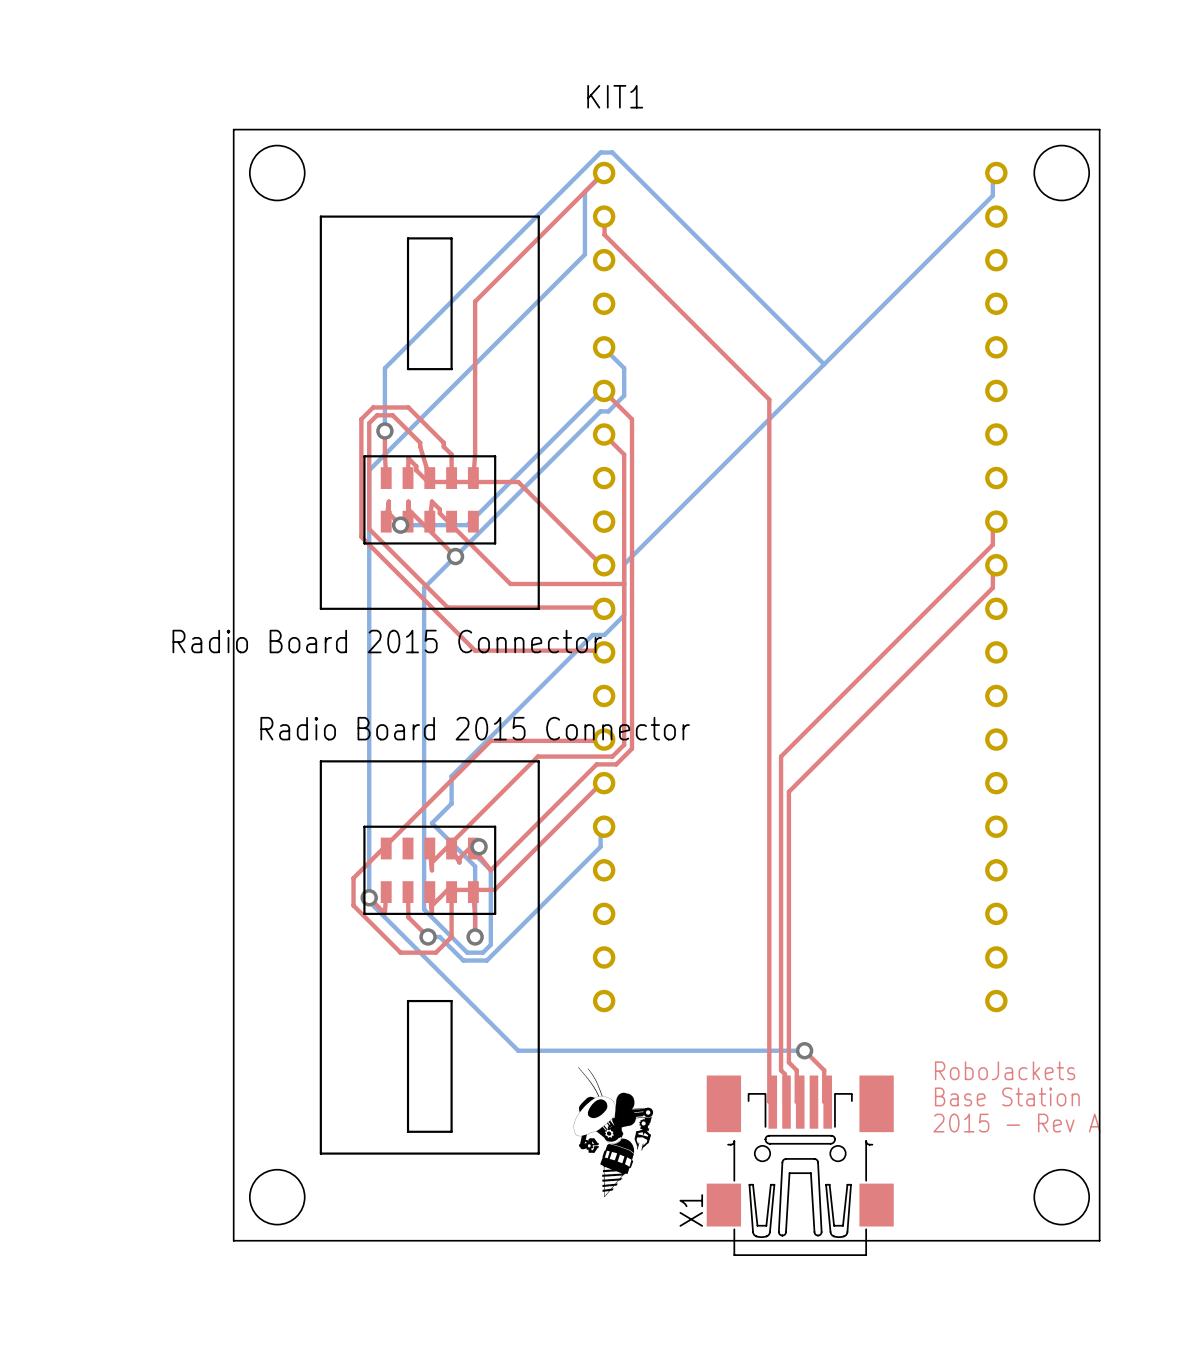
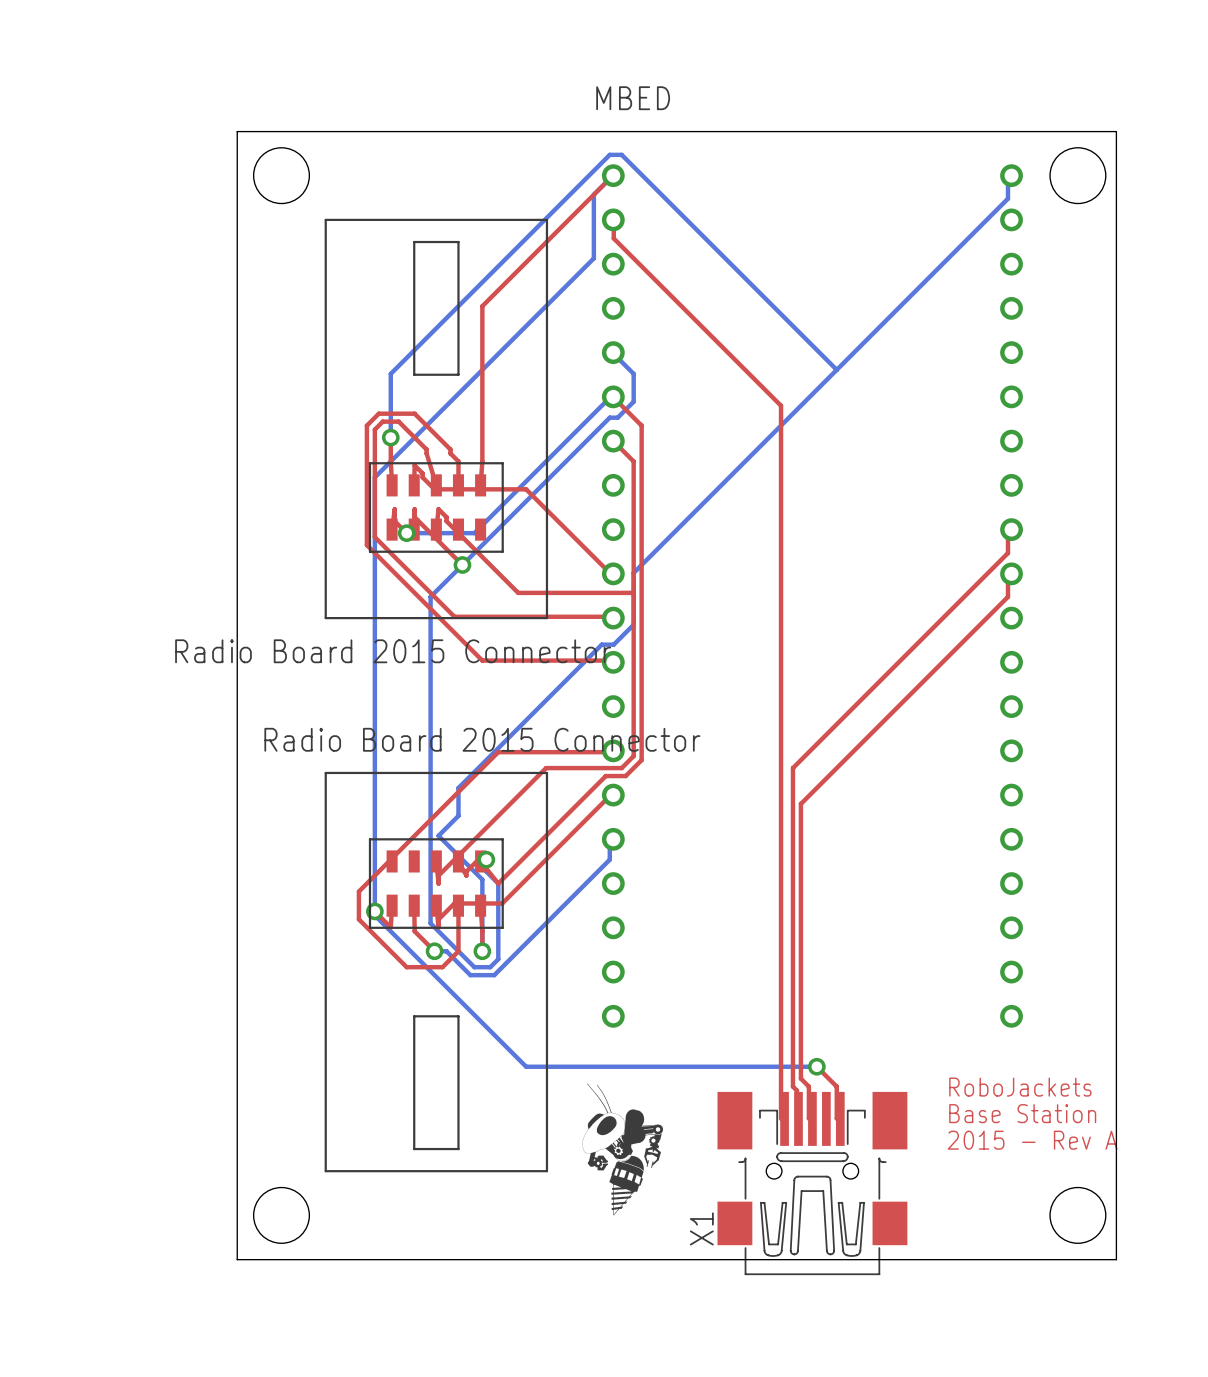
KIT1 name: KIT1 (615, 96) -> MBED (633, 98)

